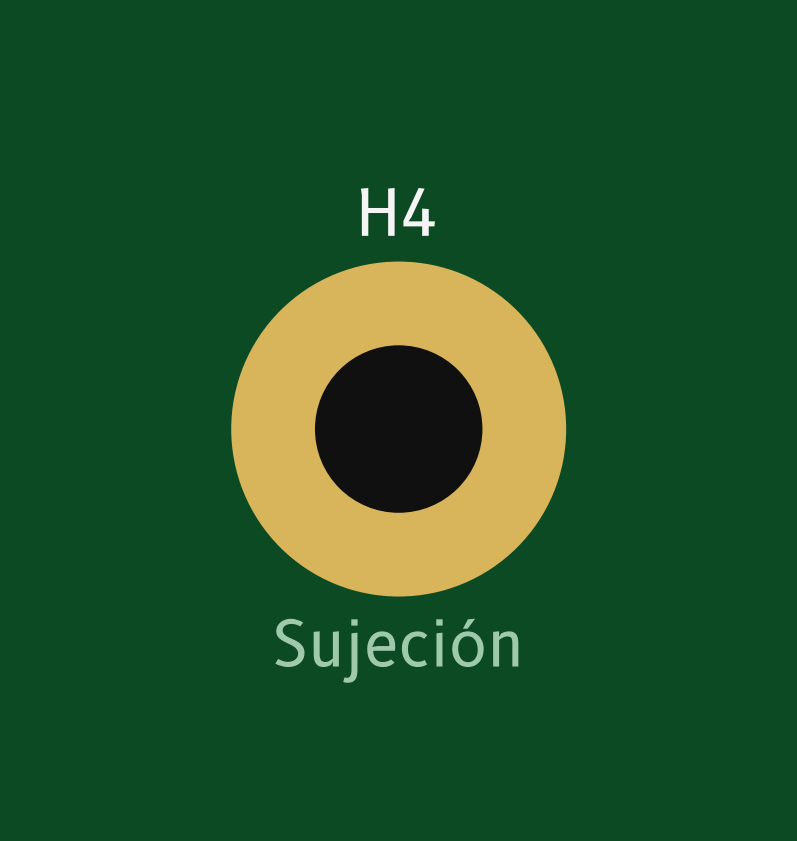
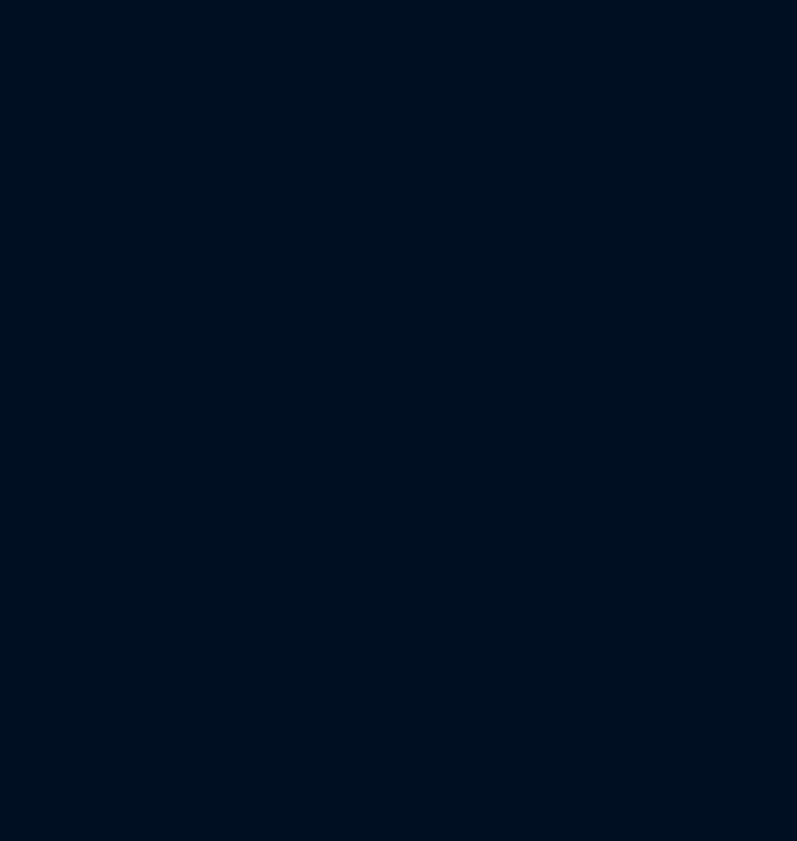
H4: Sujeción (398, 429) -> none

